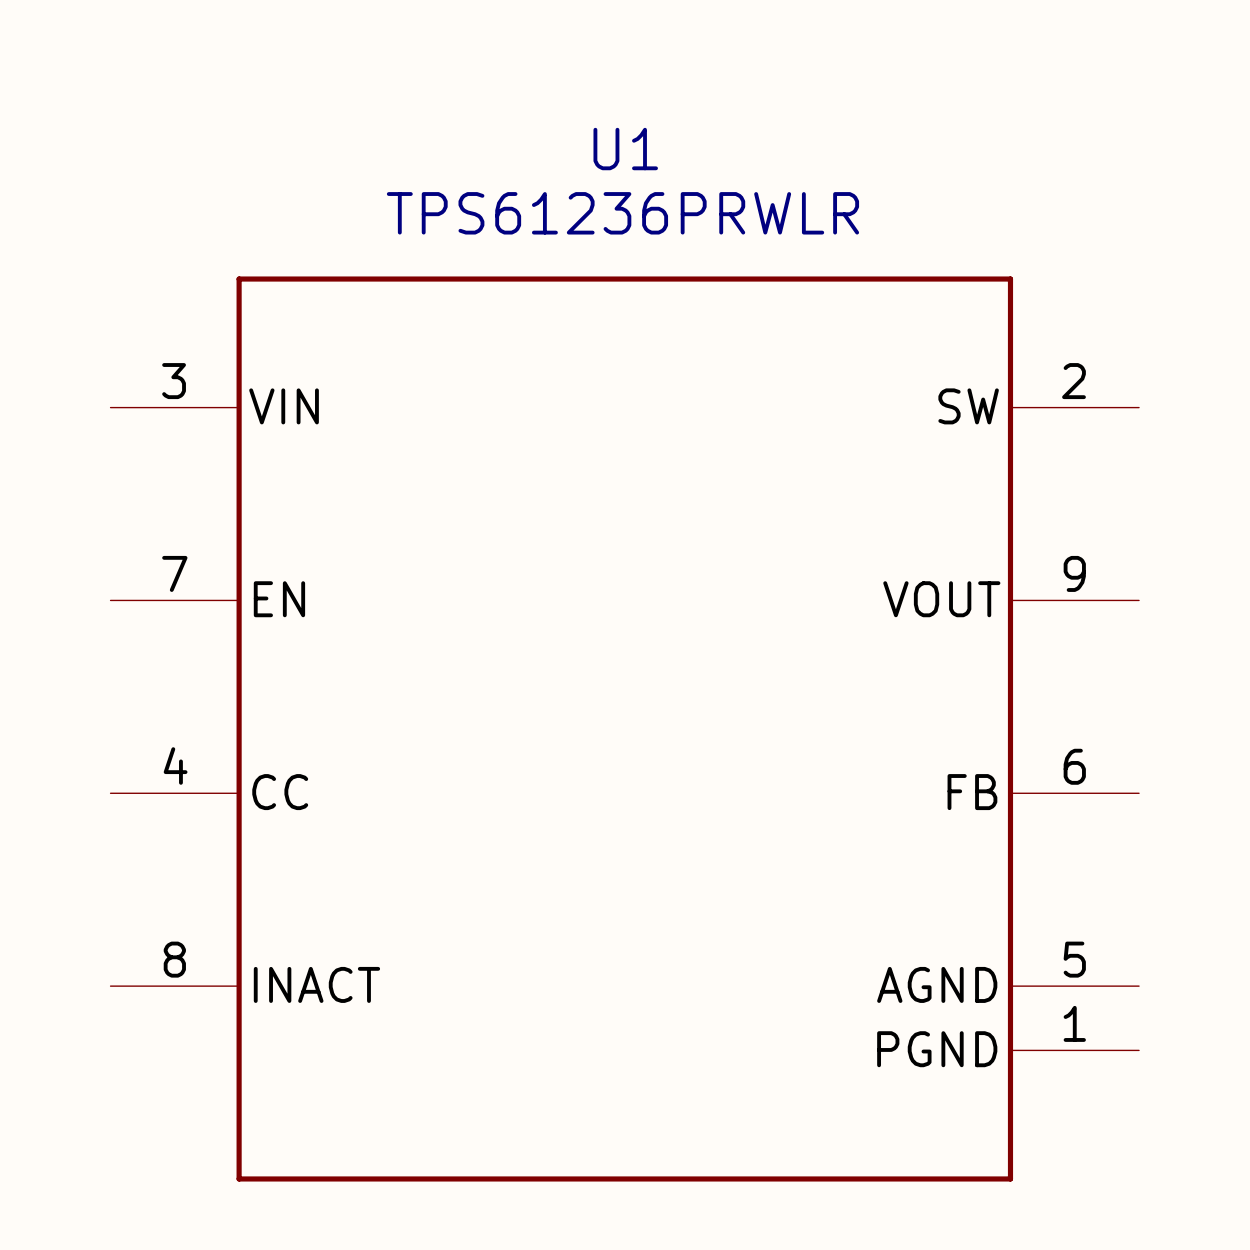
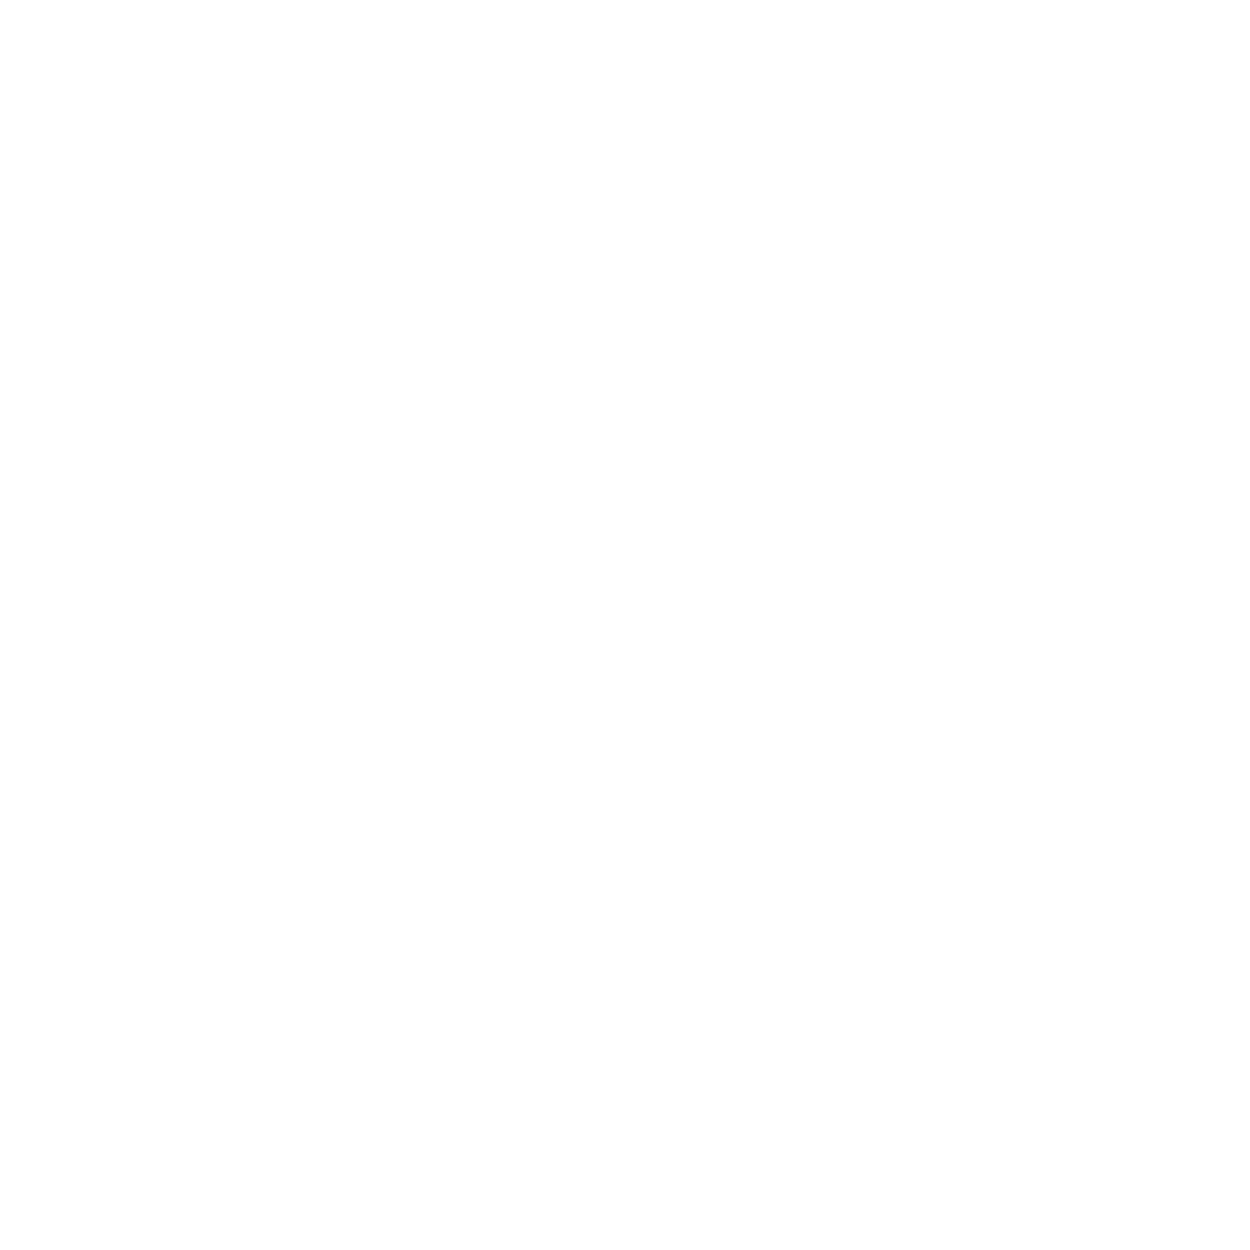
U1: TPS61236PRWLR (624, 729) -> none

